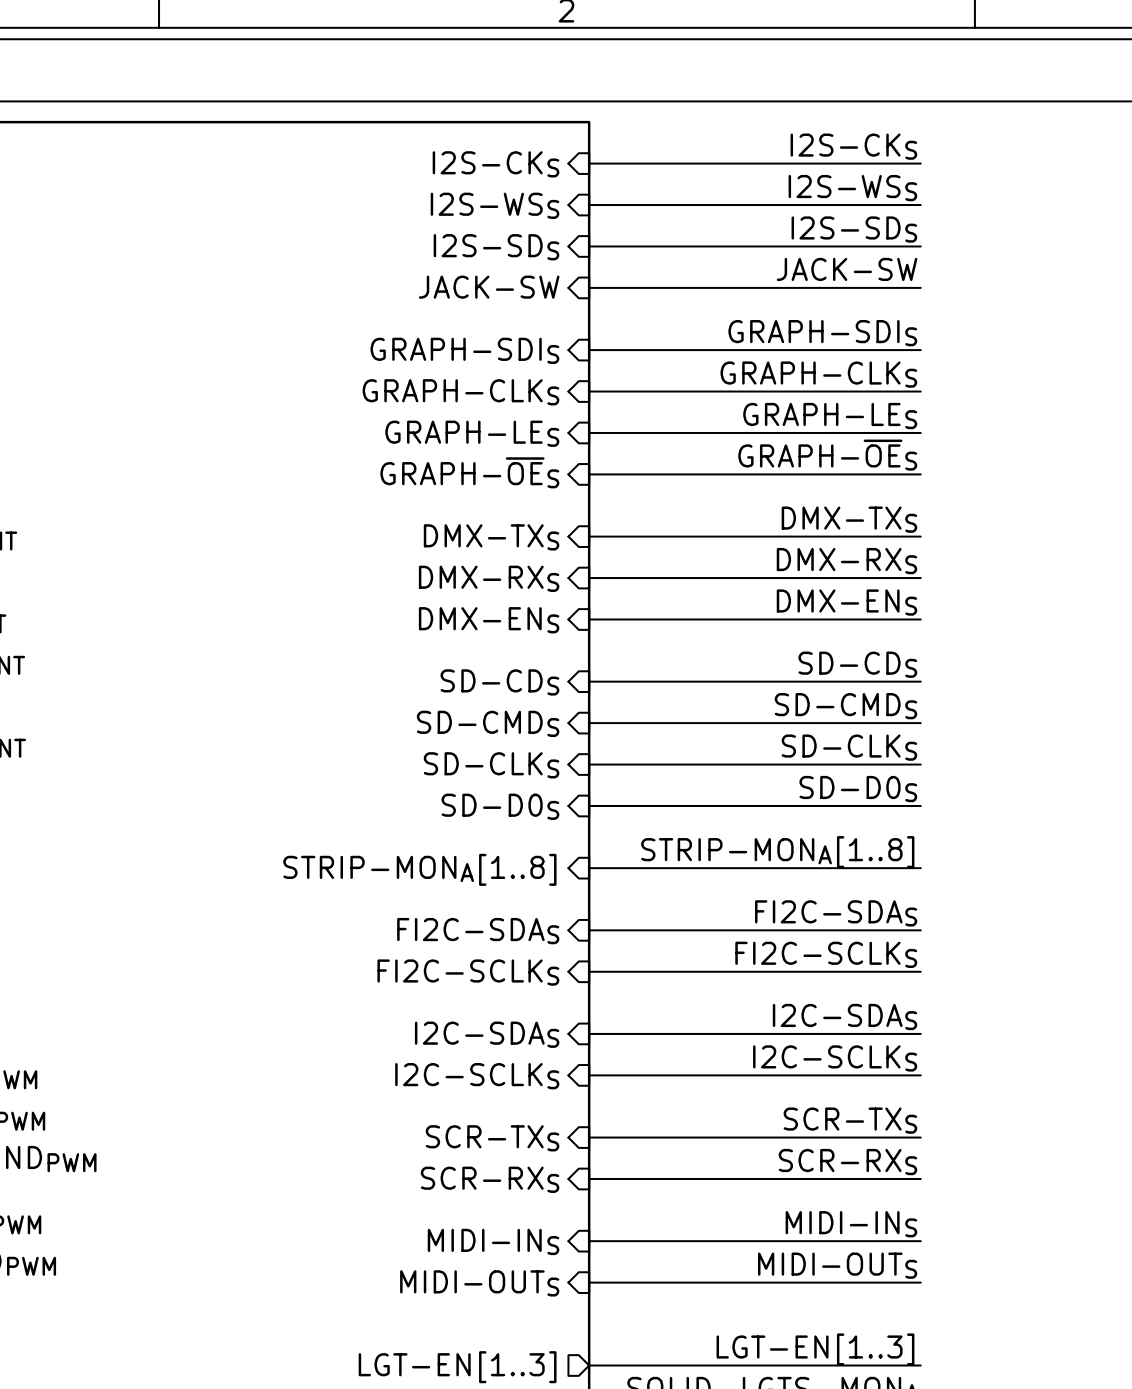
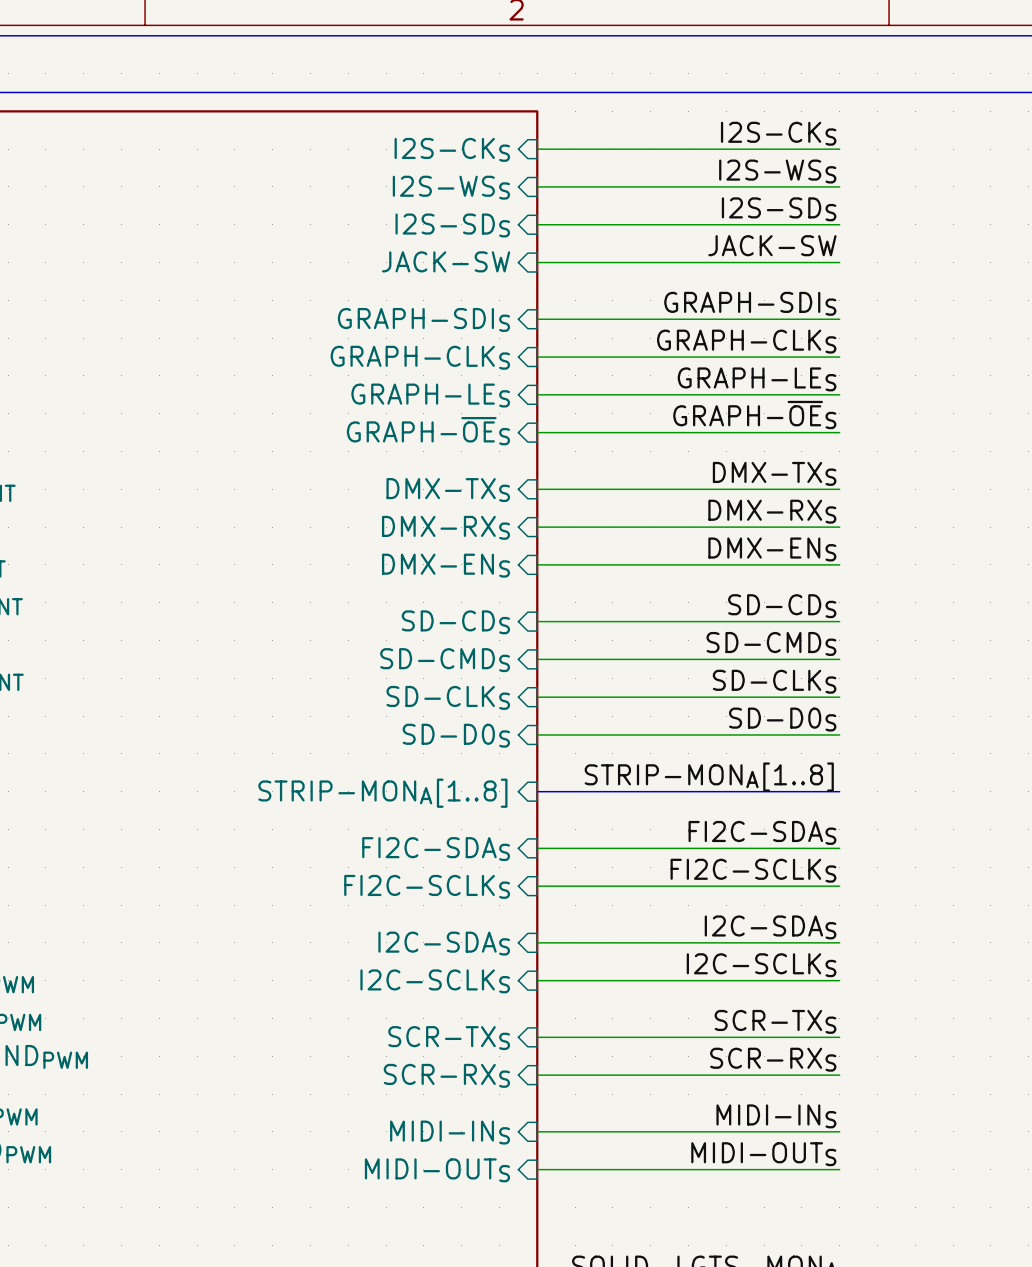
label: LGT-EN[1..3] (815, 1349) -> none
bus: (589, 1365) (920, 1365) -> none
sheet pin: LGT-EN[1..3] (457, 1367) -> none

